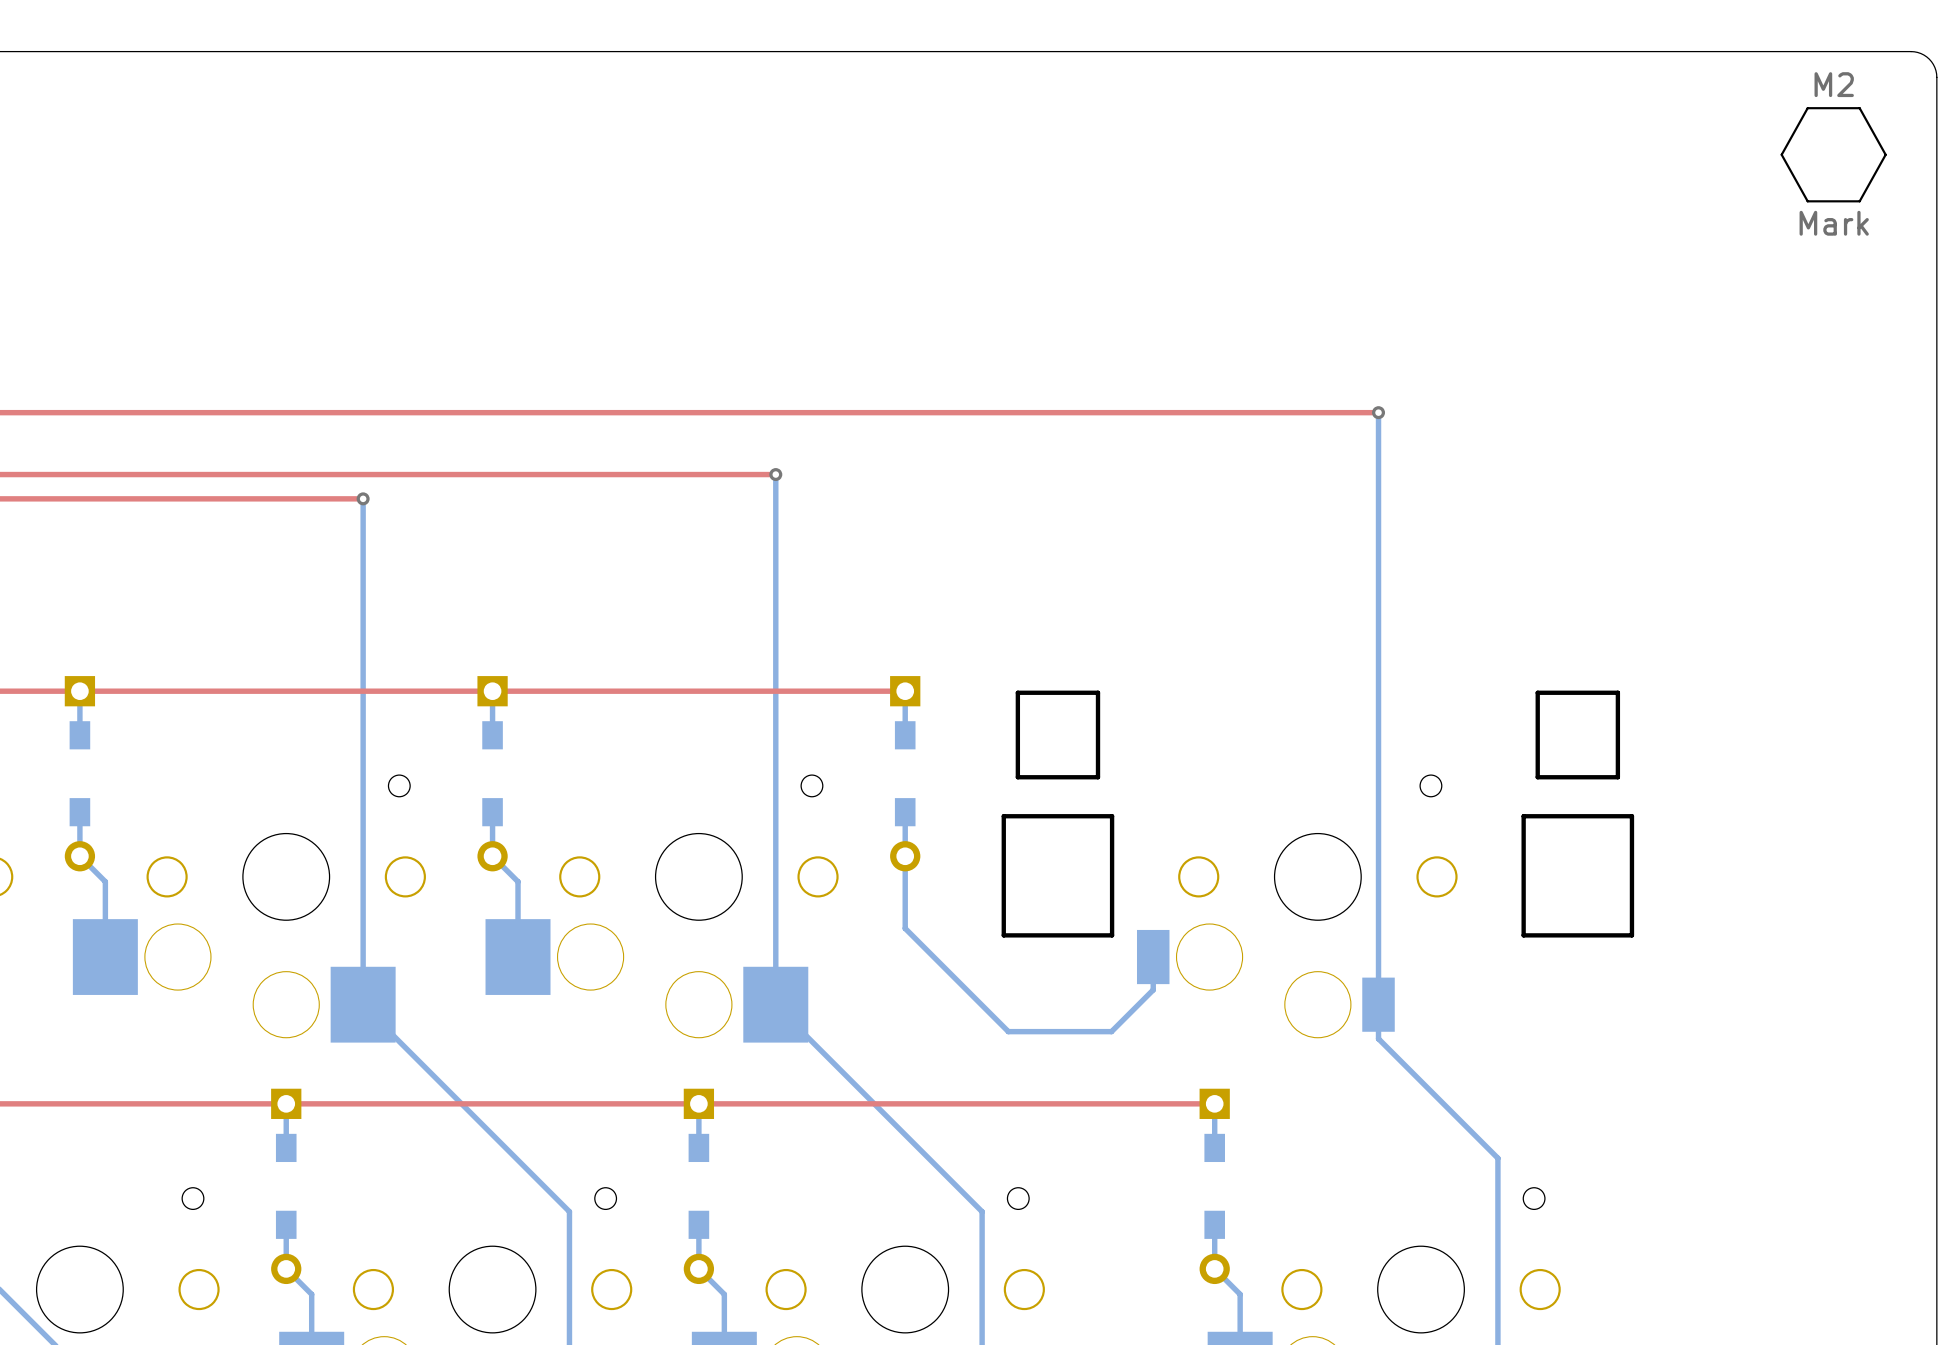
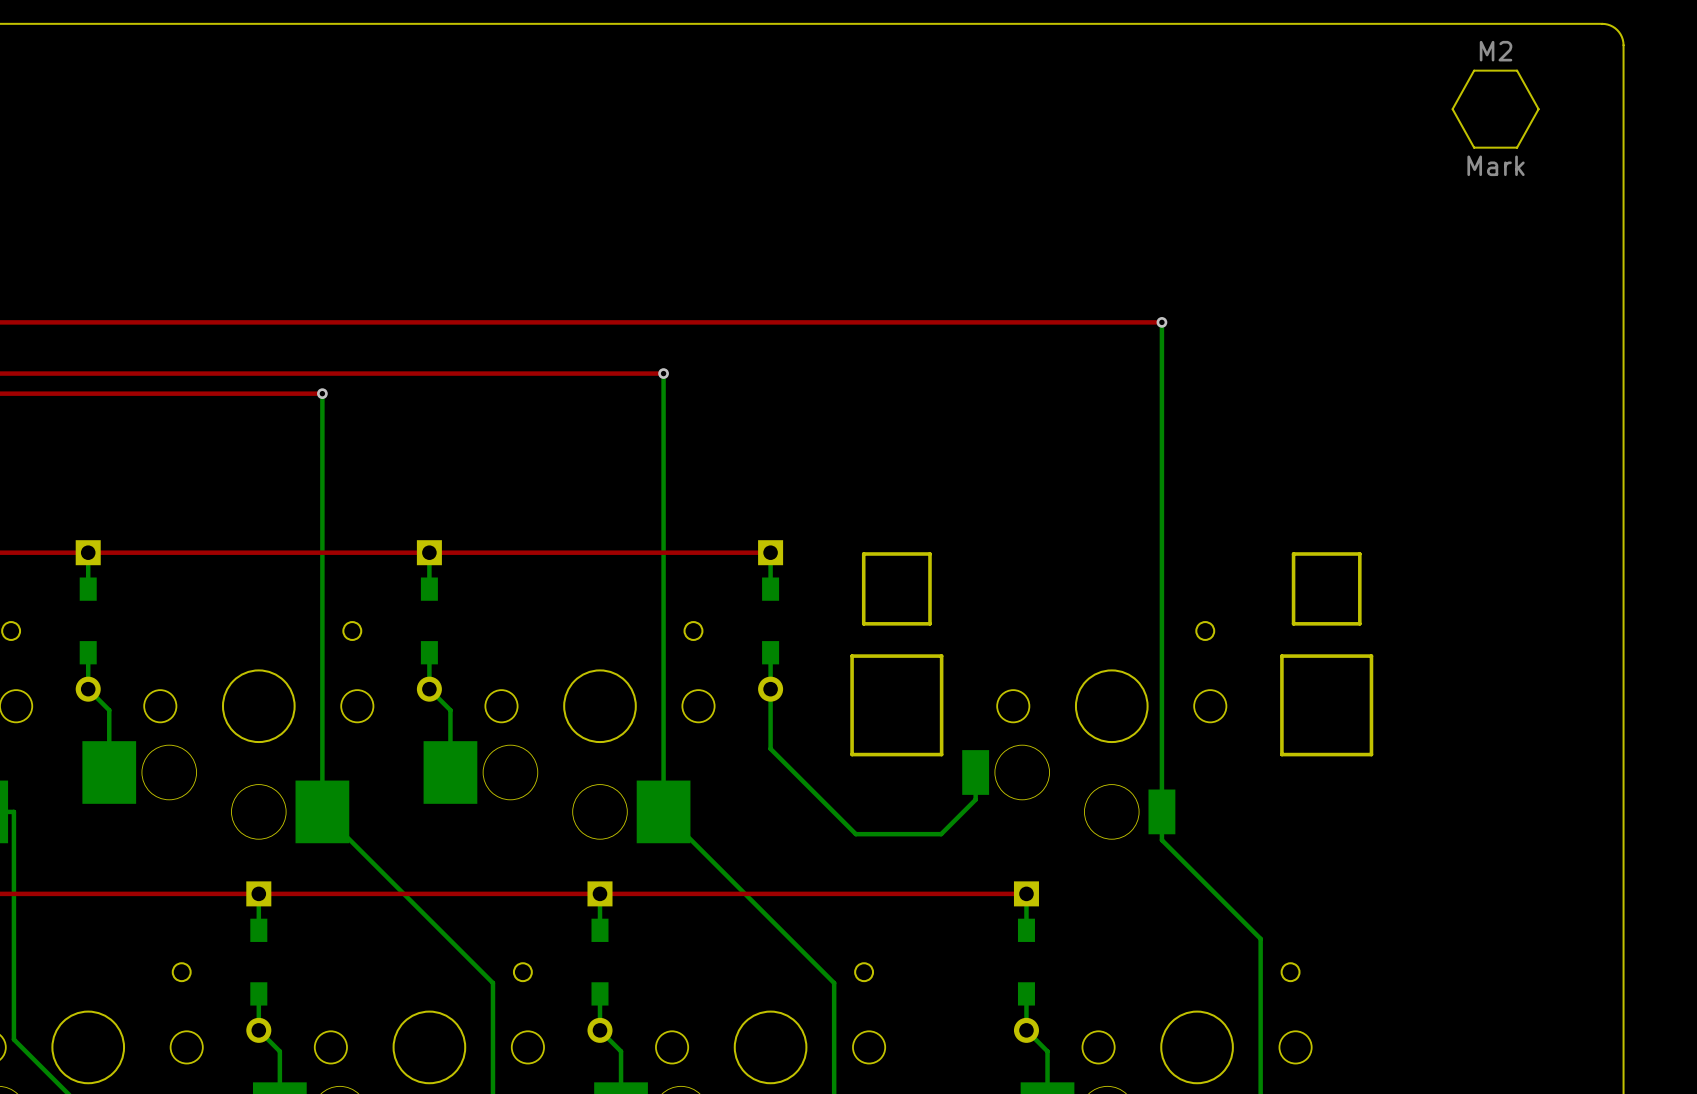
M2 position: (1833, 154) -> (1495, 109)

